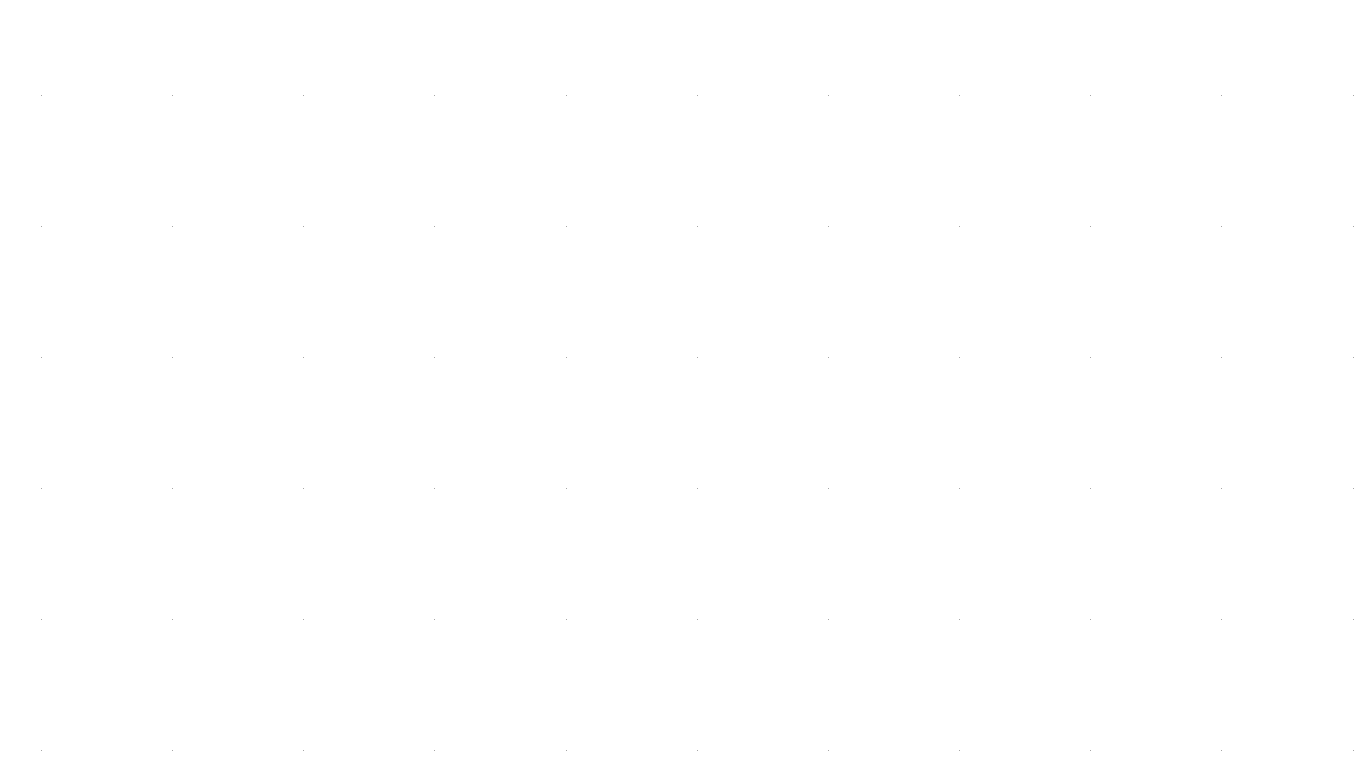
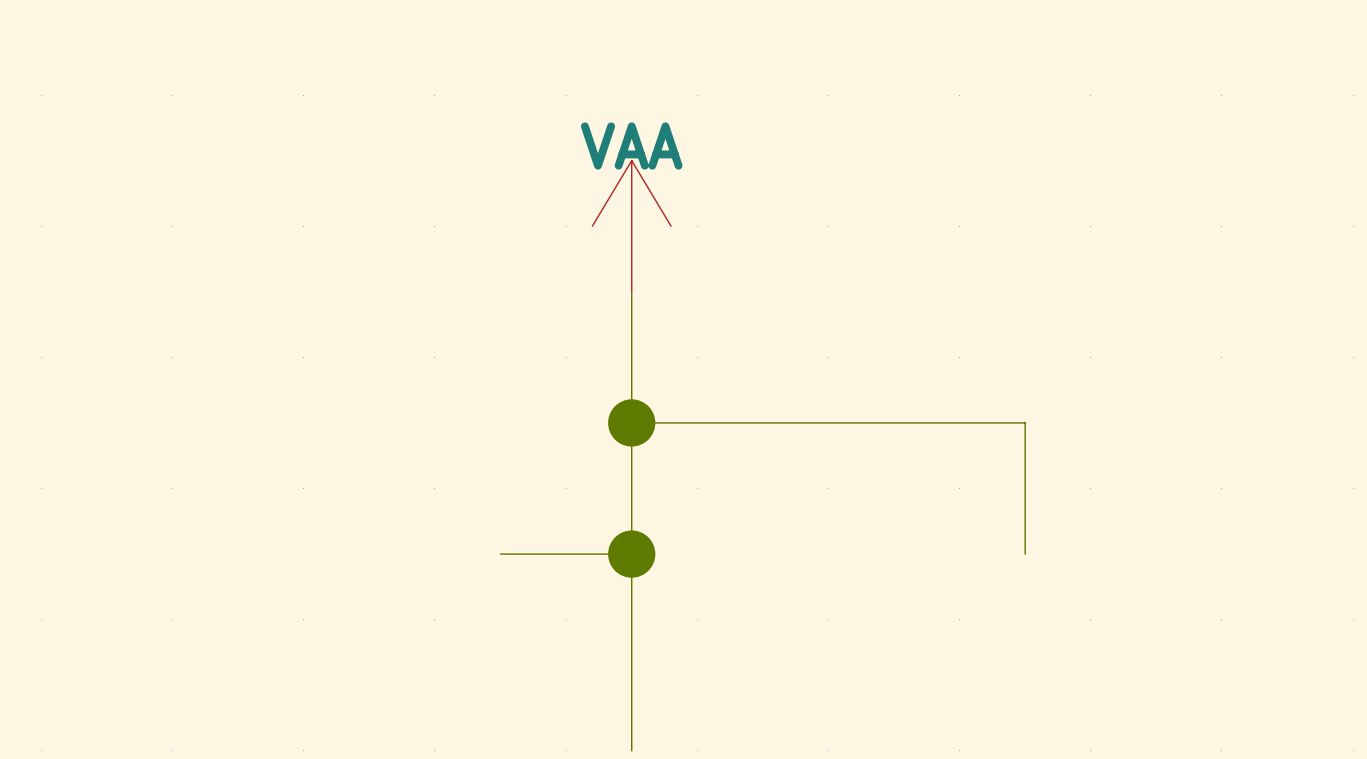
power symbol: none -> VAA (631, 226)
wire: none -> (631, 291) (631, 750)
wire: none -> (631, 422) (1025, 422) (1025, 554)
junction: none -> (631, 422)
wire: none -> (500, 554) (631, 554)
junction: none -> (631, 554)

